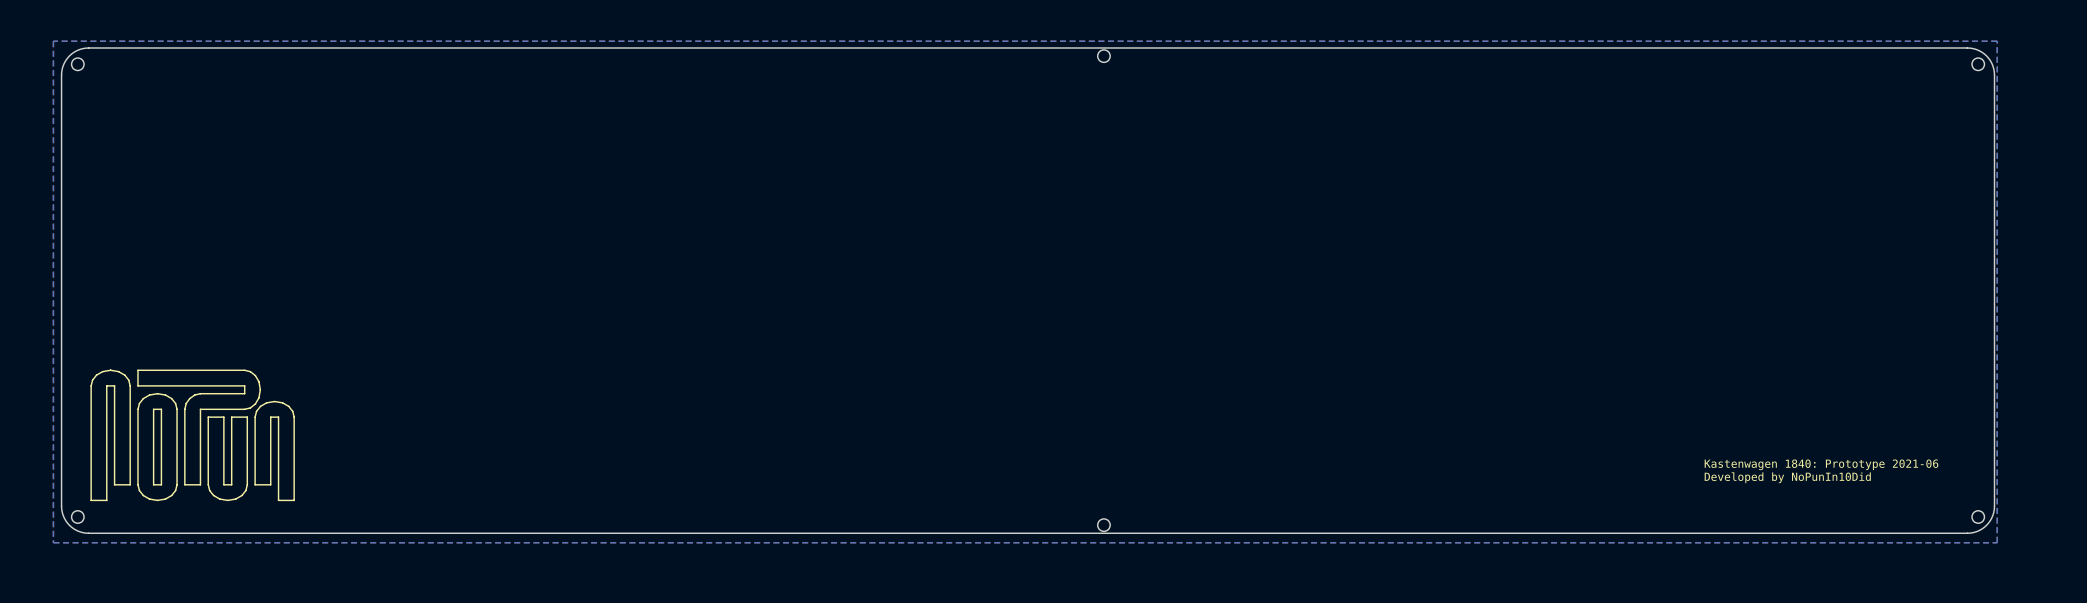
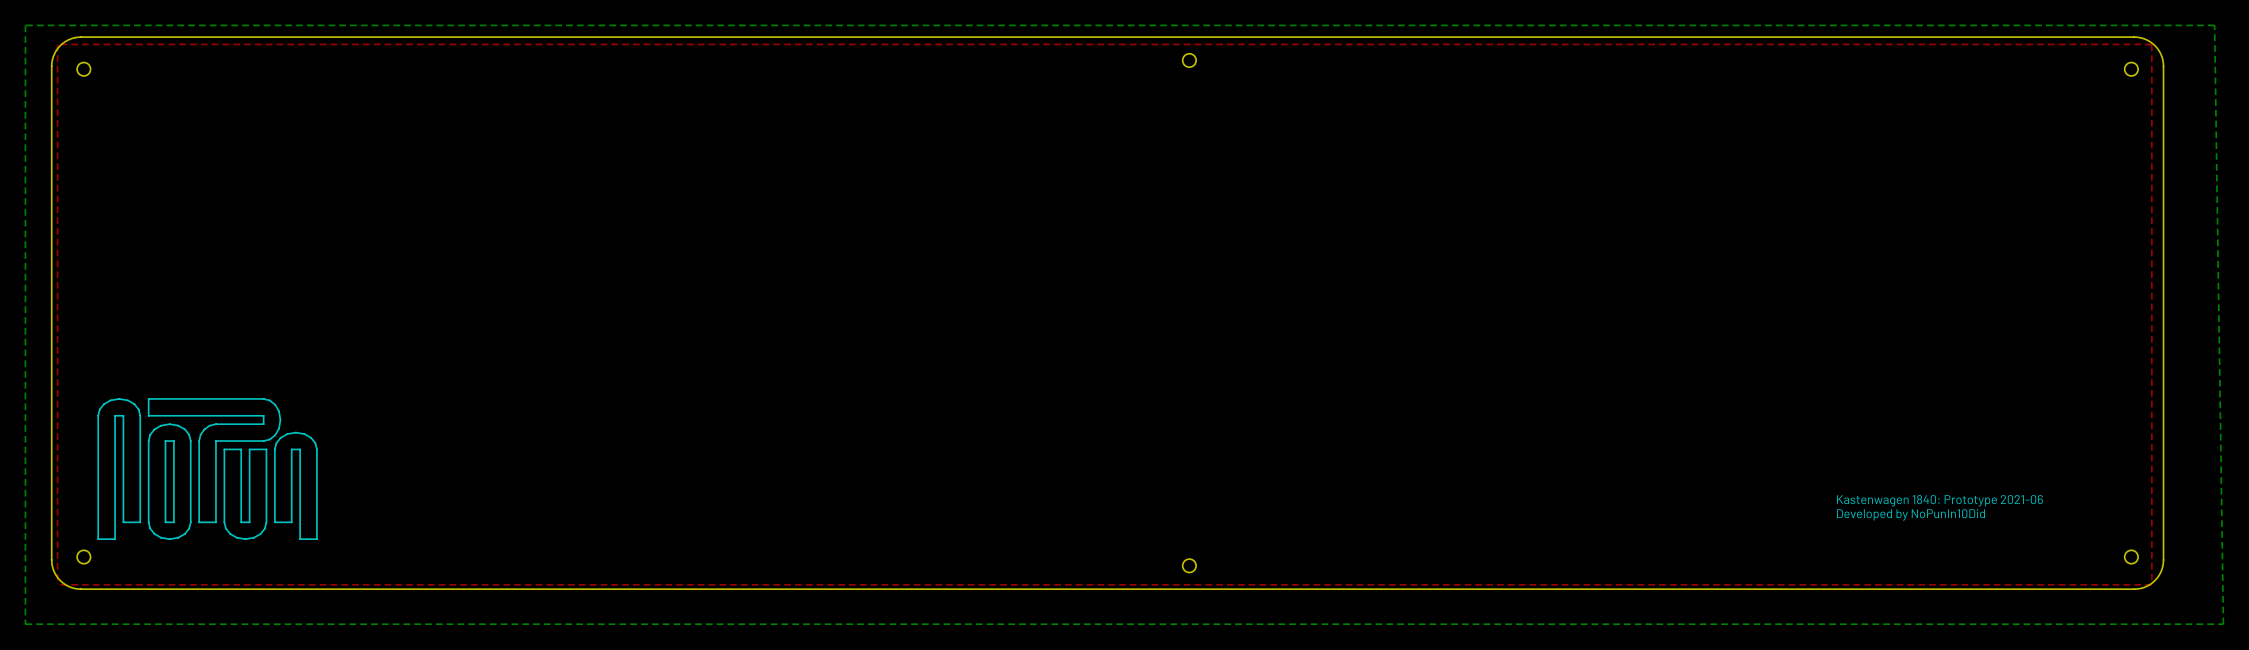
bottom zone outline: (1997, 41) (1997, 542) (53, 542) (53, 41) (1997, 41) -> (2214, 25) (2223, 624) (25, 624) (25, 25) (2214, 25)
board edge: (1967, 48) (82, 48) (74, 52) (67, 58) (63, 66) (61, 75) (62, 512) (65, 520) (71, 527) (79, 531) (88, 533) (1973, 532) (1981, 529) (1988, 523) (1992, 515) (1994, 506) (1994, 75) (1991, 63) (1986, 55) (1976, 49) (1967, 48) -> (2134, 37) (2143, 38) (2154, 45) (2160, 53) (2163, 66) (2163, 559) (2161, 569) (2157, 578) (2149, 584) (2140, 588) (80, 589) (71, 587) (62, 582) (56, 575) (52, 566) (51, 66) (53, 56) (58, 48) (65, 41) (74, 37) (2134, 37)

